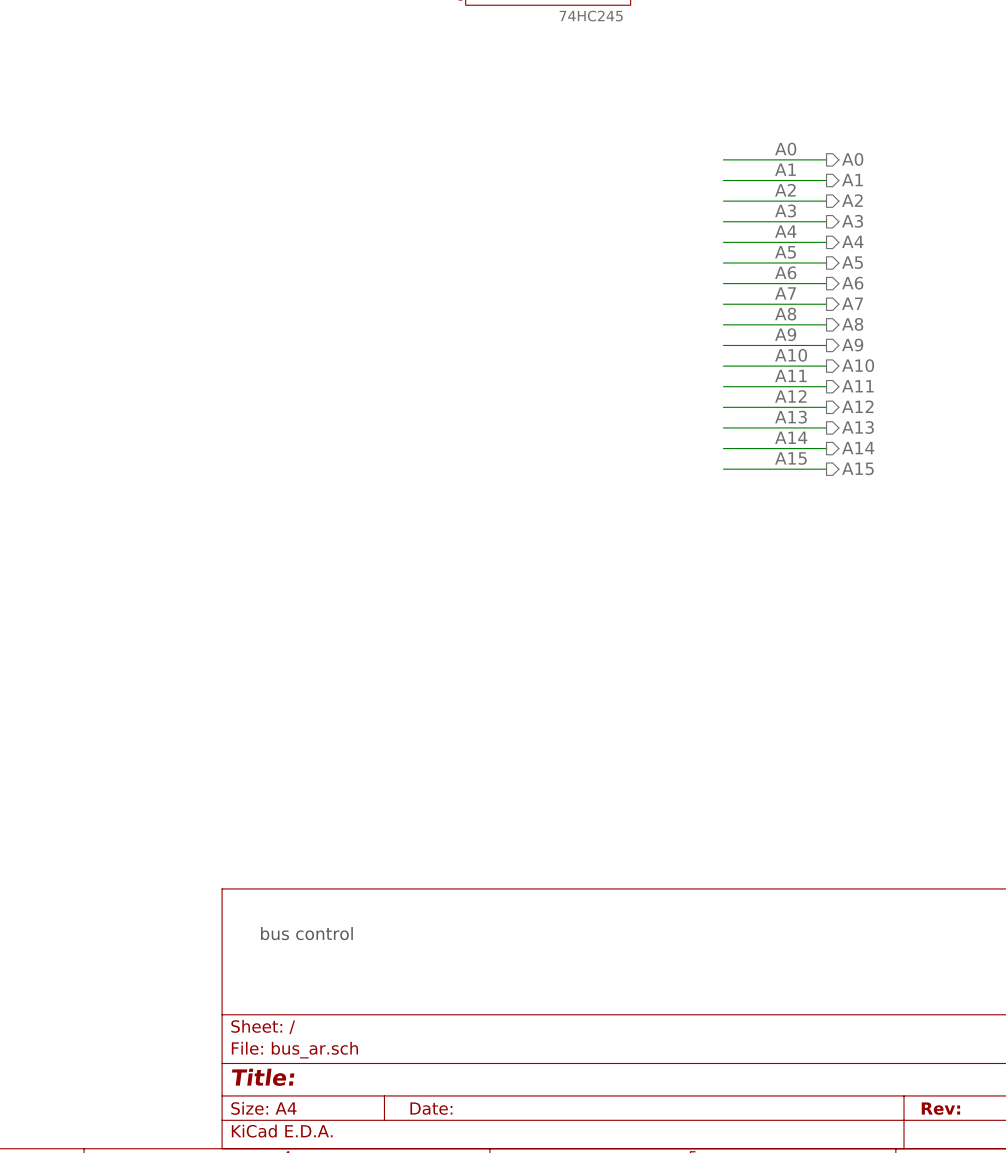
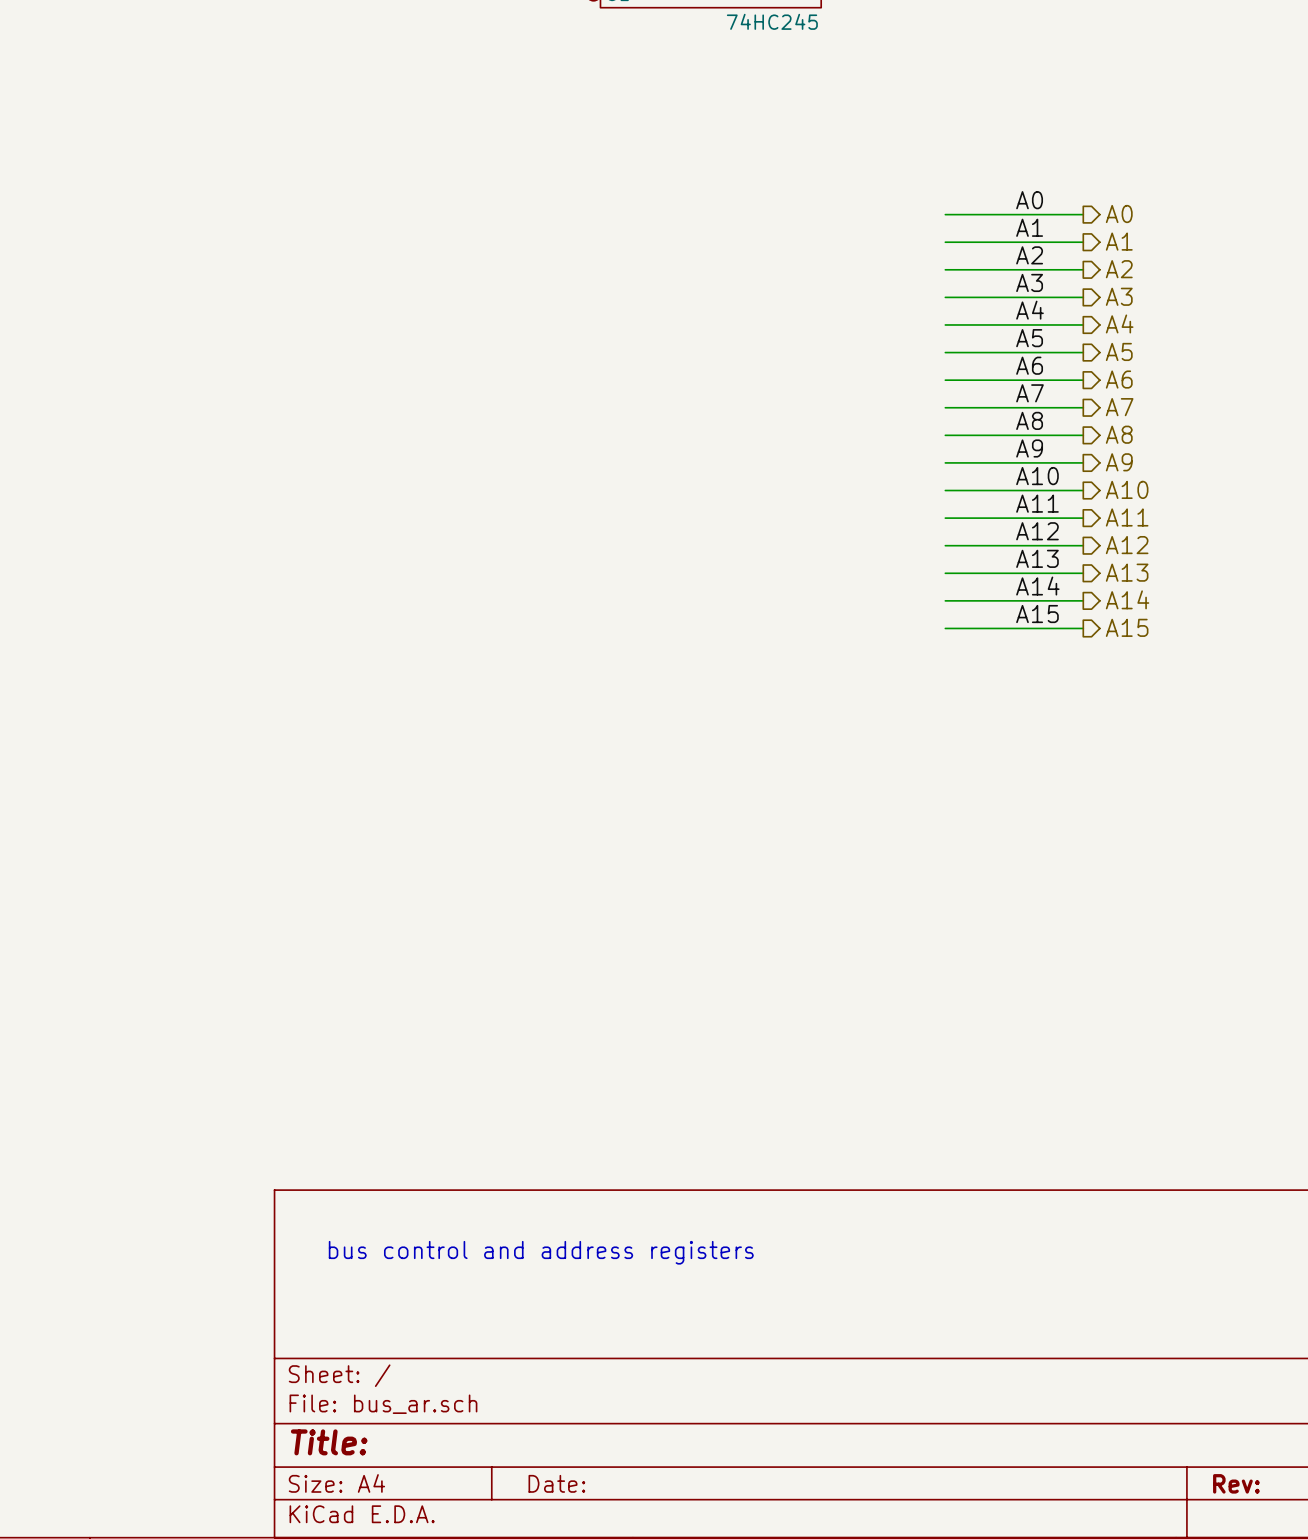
text: bus control (306, 933) -> bus control and address registers (541, 1252)

